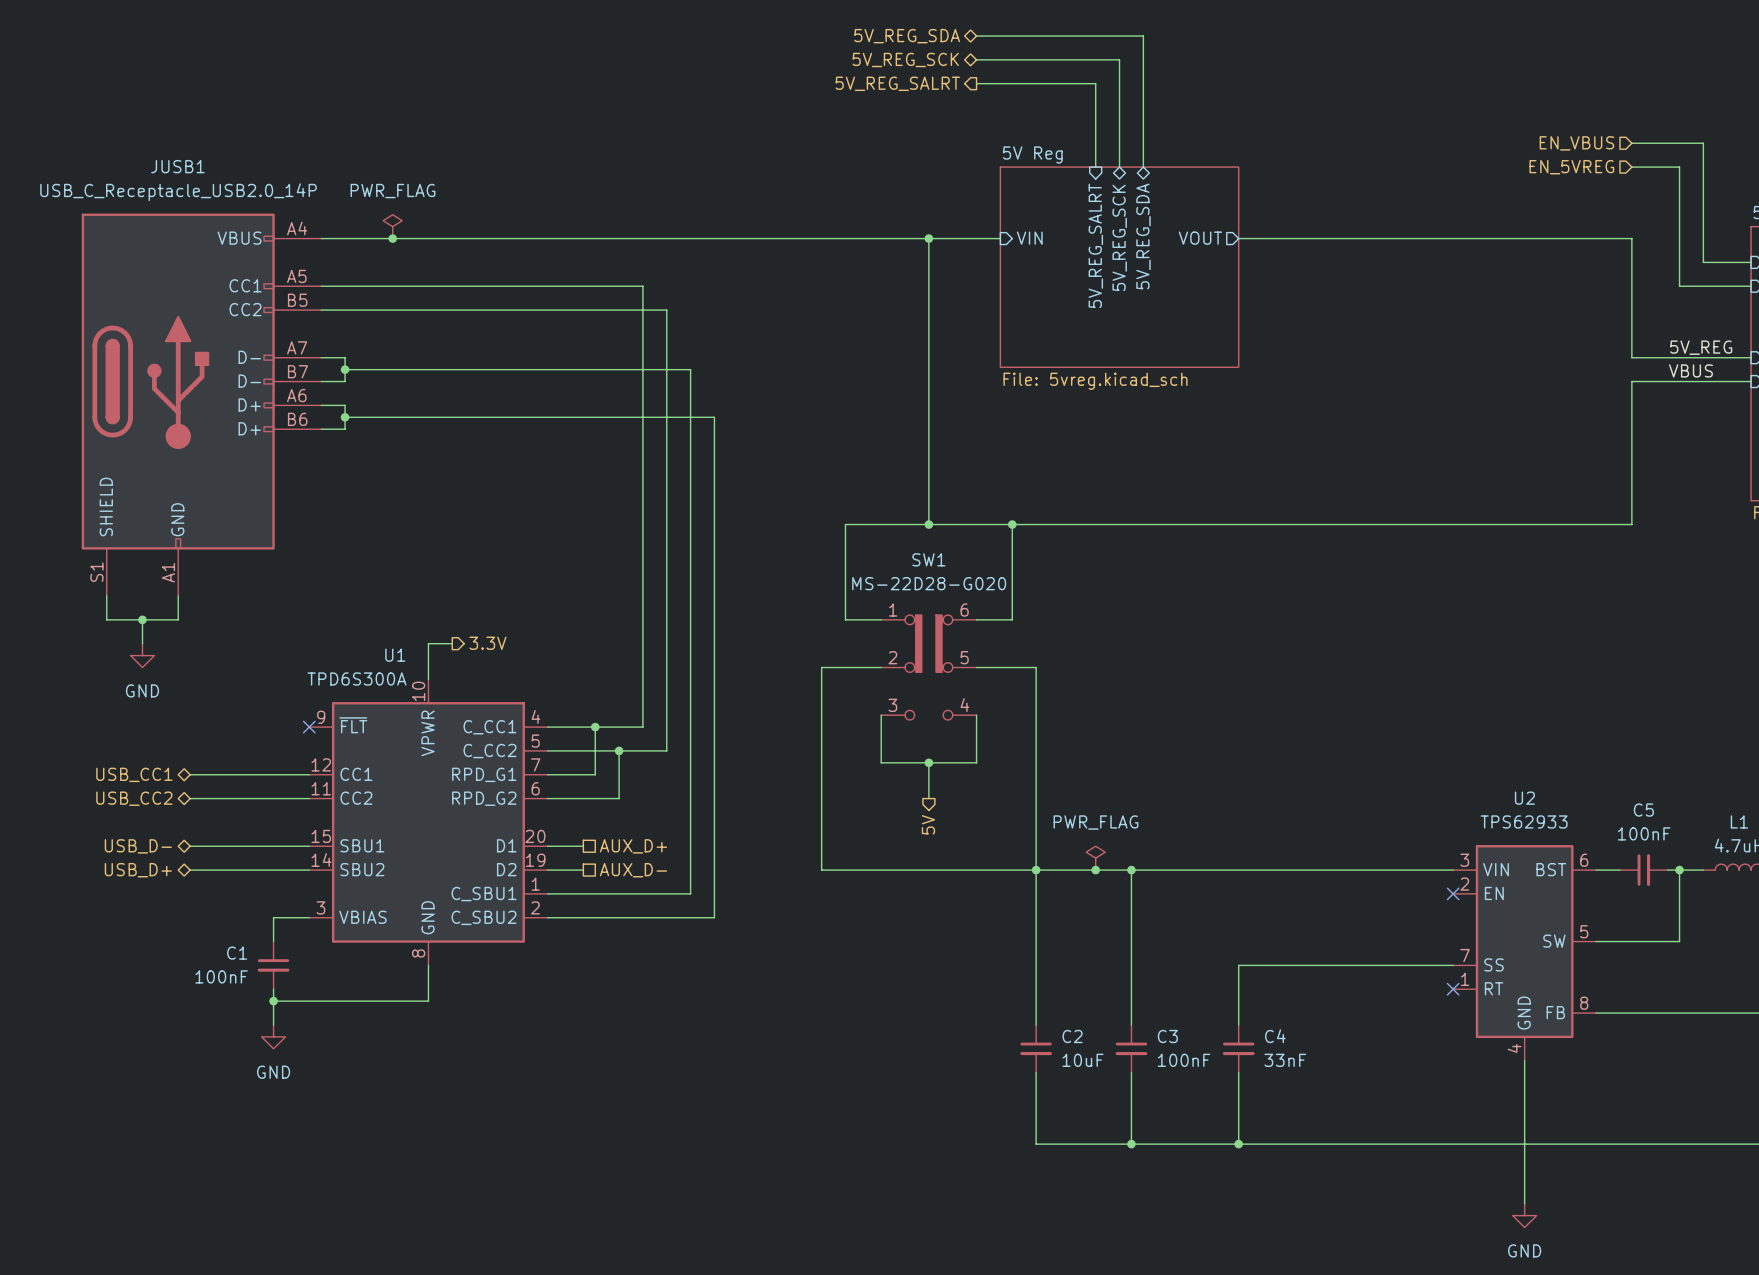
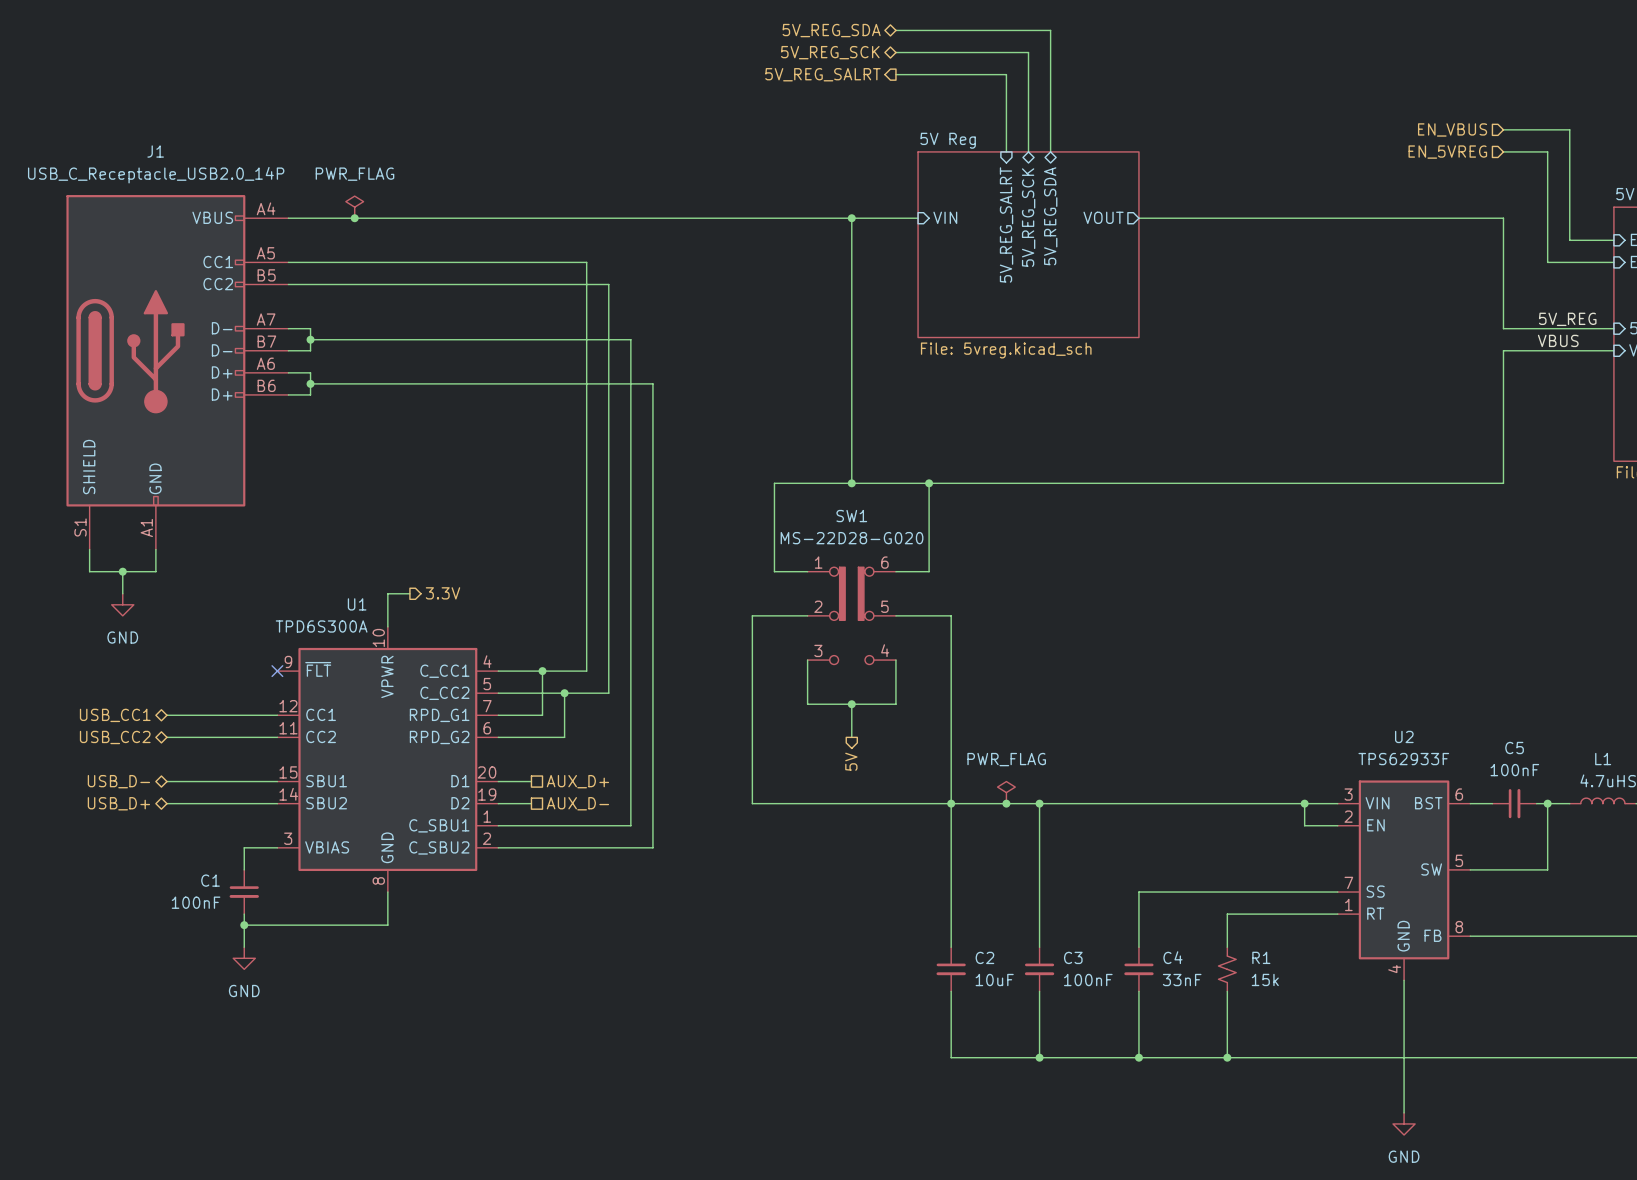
JUSB1 name: JUSB1 (177, 166) -> J1 (155, 151)
U2 value: TPS62933 (1524, 821) -> TPS62933F (1403, 759)
wire: none -> (1304, 803) (1304, 825) (1337, 825)
junction: none -> (1304, 803)
no-connect mark: (1453, 893) -> none
wire: none -> (1337, 914) (1227, 914) (1227, 947)
no-connect mark: (1453, 989) -> none
R1: none -> 15k (1227, 969)
wire: none -> (1227, 991) (1227, 1057)
junction: none -> (1227, 1057)

